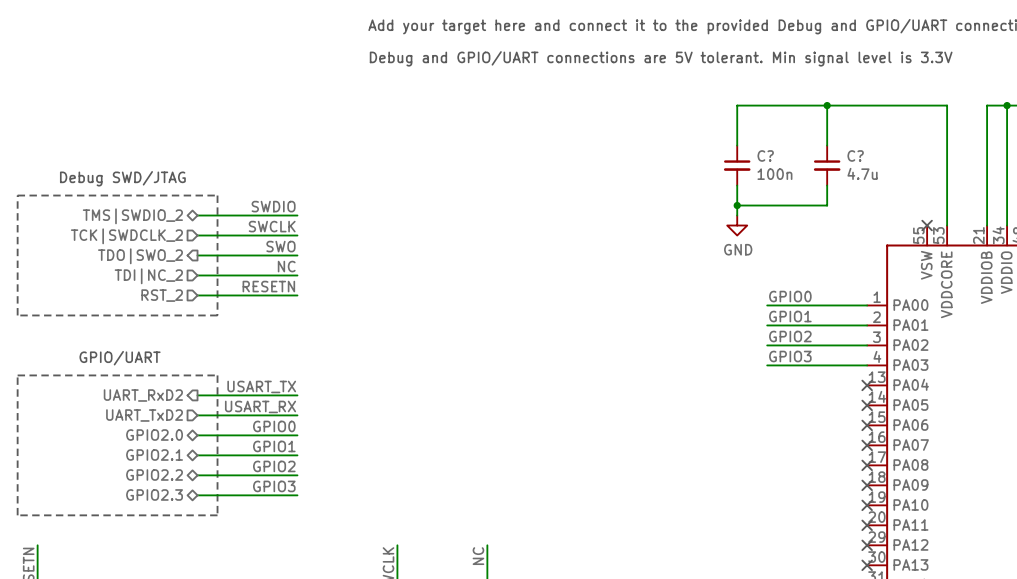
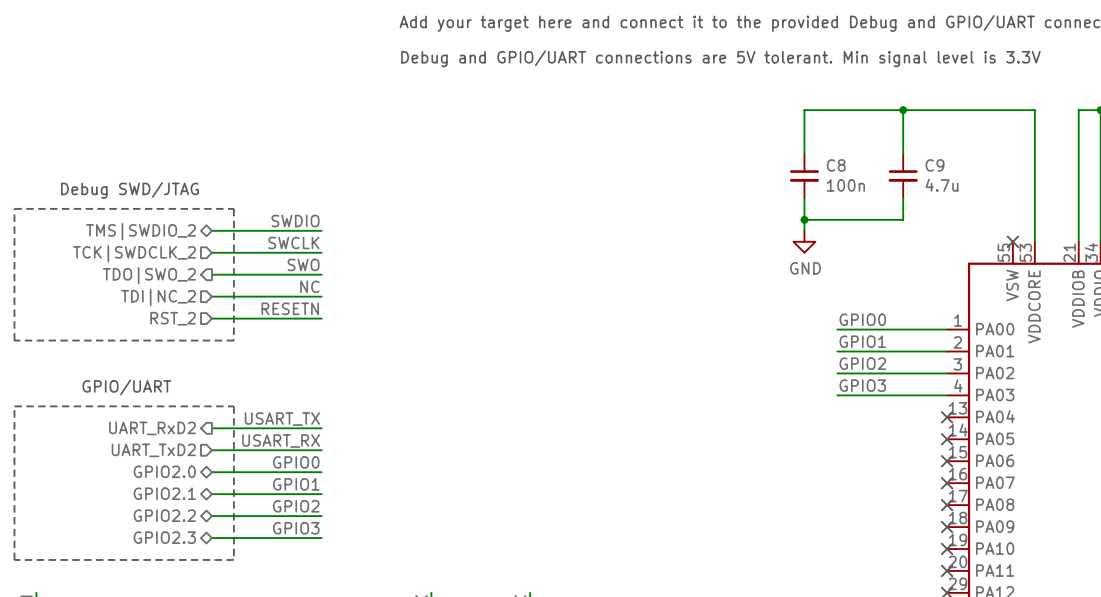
C? name: C? (765, 155) -> C8 (836, 165)
C? name: C? (855, 155) -> C9 (934, 165)

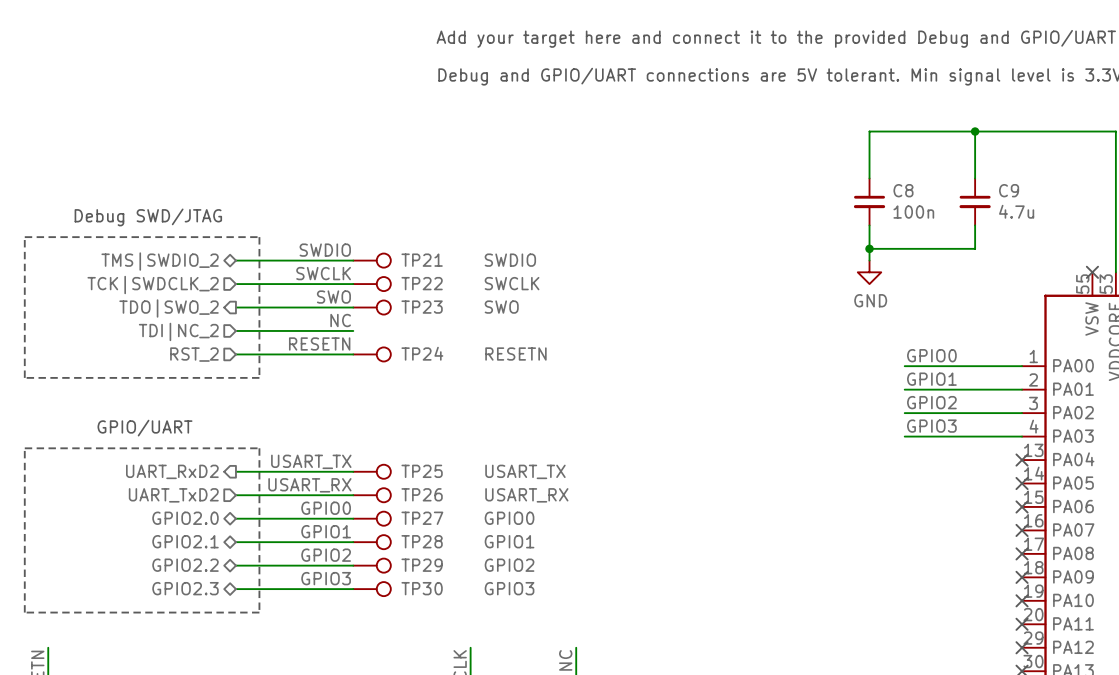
TP21: none -> SWDIO (372, 260)
TP22: none -> SWCLK (372, 284)
TP23: none -> SWO (372, 307)
TP24: none -> RESETN (372, 354)
TP25: none -> USART_TX (372, 471)
TP26: none -> USART_RX (372, 495)
TP27: none -> GPIO0 (372, 518)
TP28: none -> GPIO1 (372, 542)
TP29: none -> GPIO2 (372, 565)
TP30: none -> GPIO3 (372, 589)

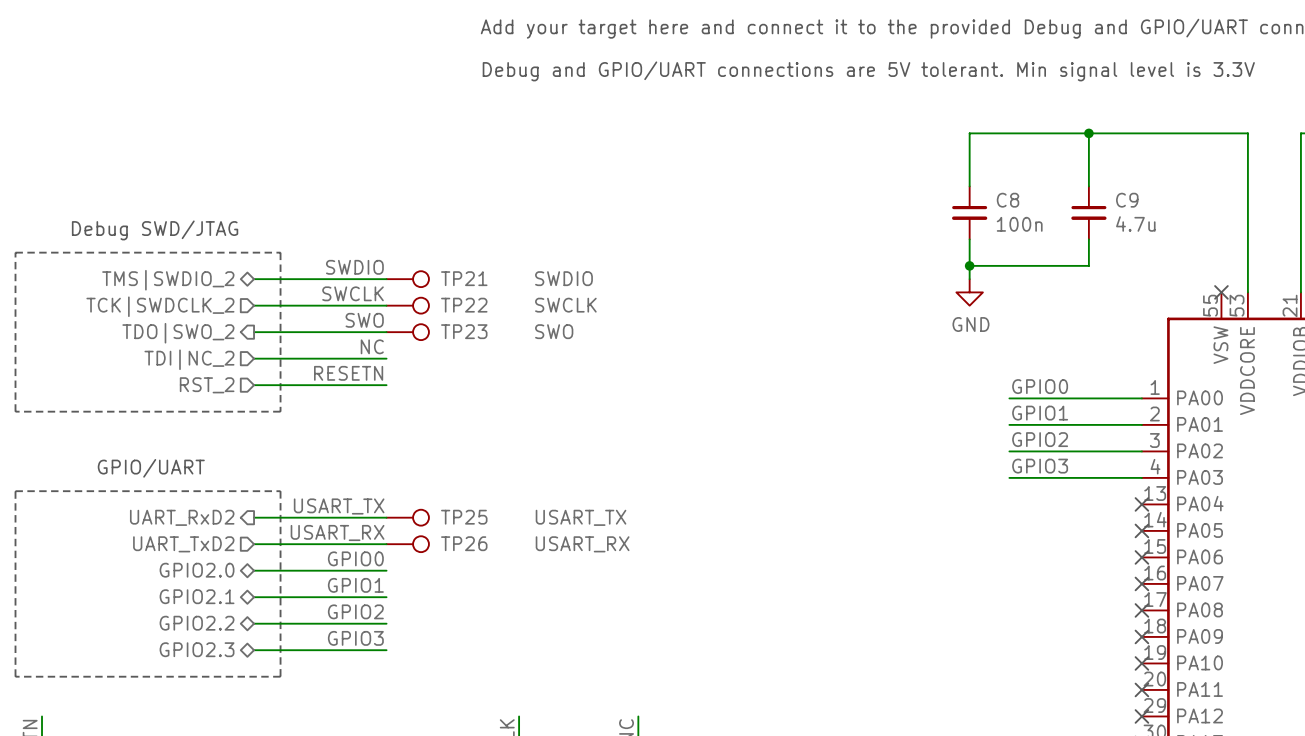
TP24: RESETN (372, 354) -> none
TP27: GPIO0 (372, 518) -> none
TP28: GPIO1 (372, 542) -> none
TP29: GPIO2 (372, 565) -> none
TP30: GPIO3 (372, 589) -> none

